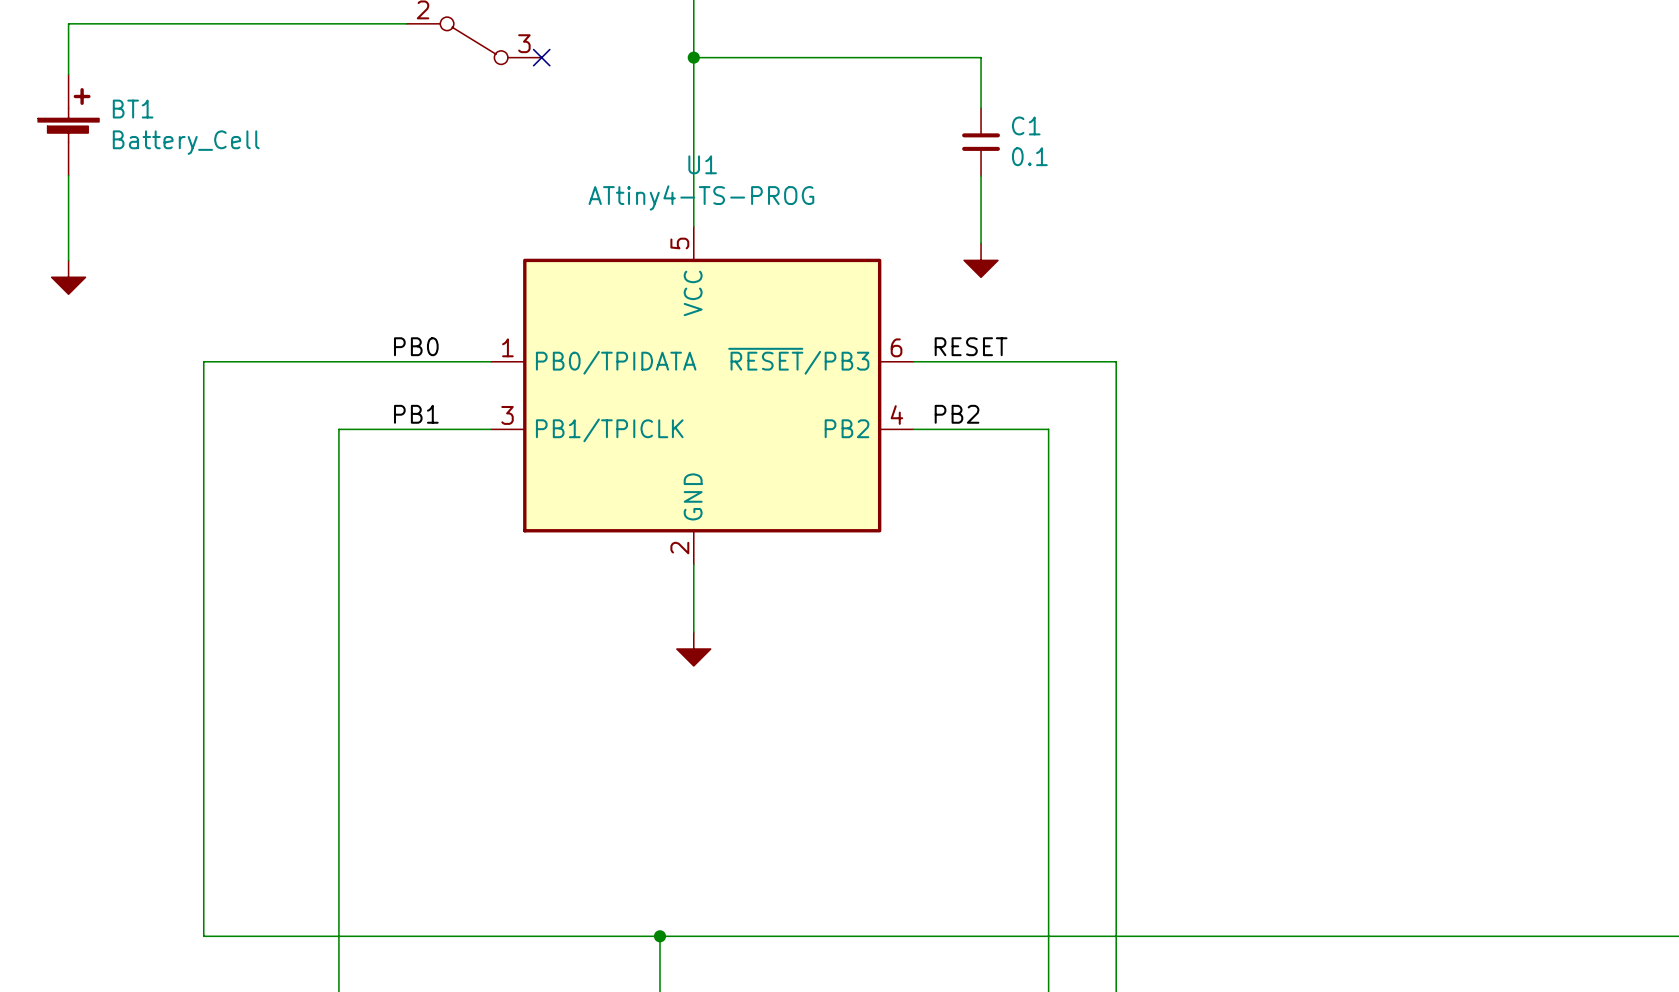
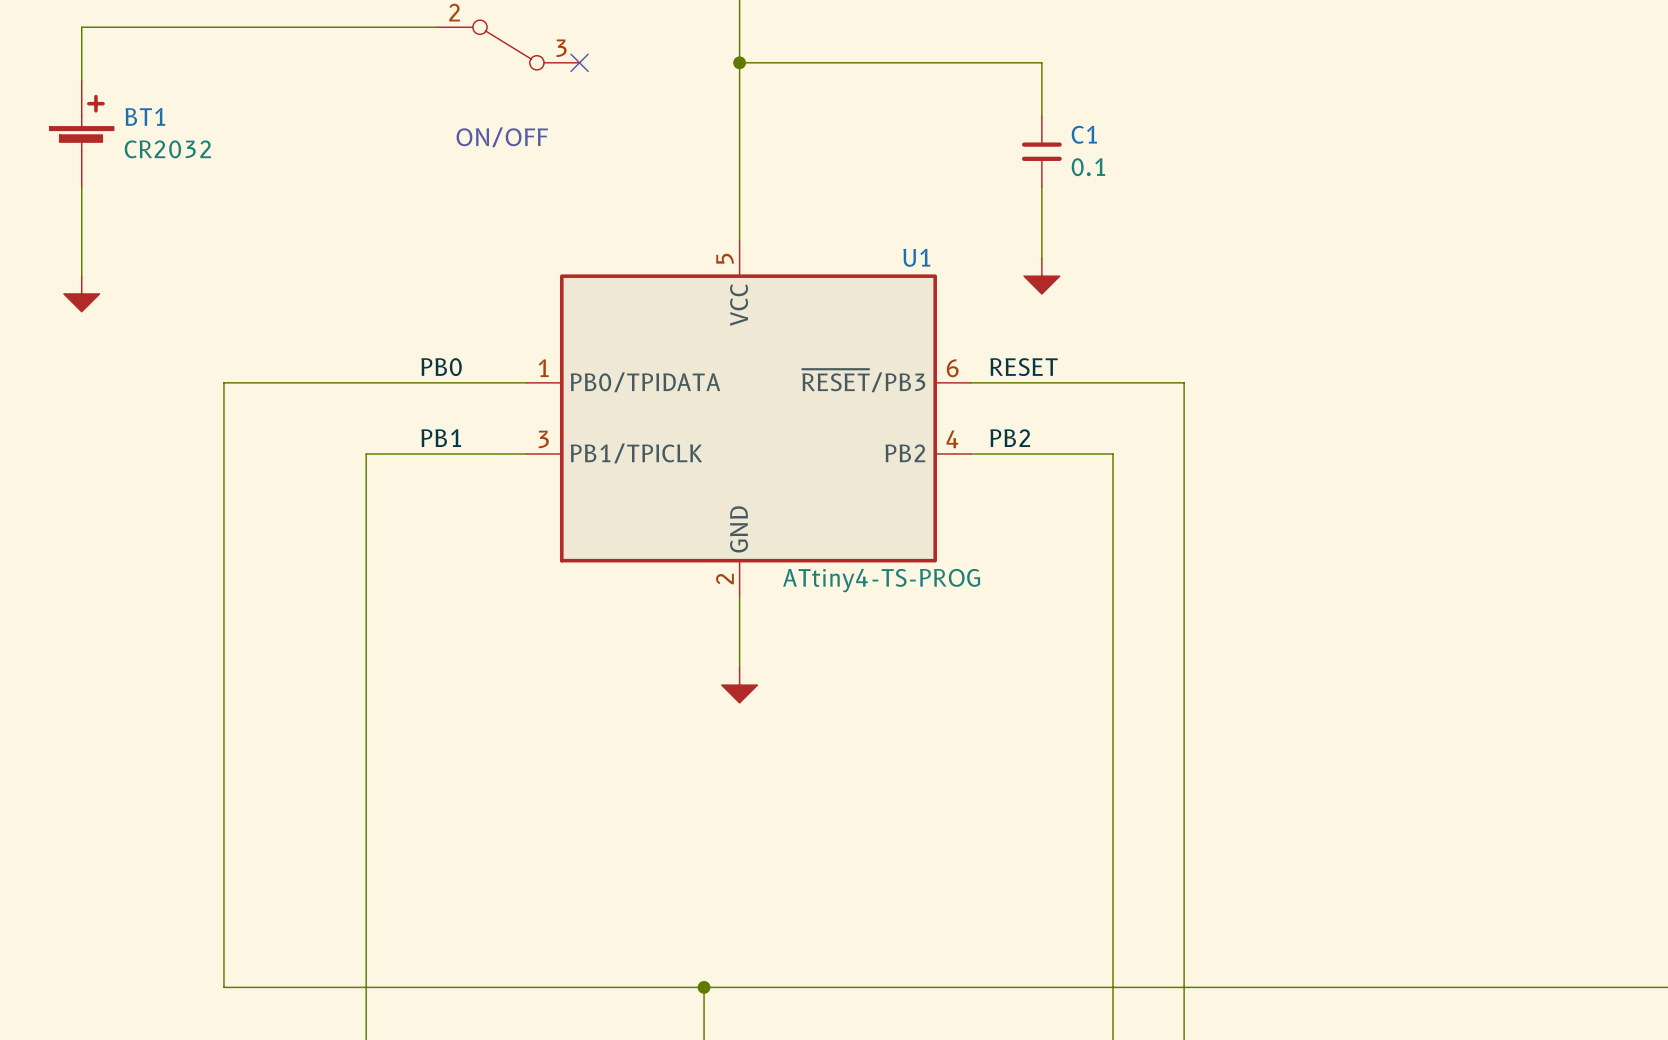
text: none -> ON/OFF (502, 137)
BT1 value: Battery_Cell (186, 142) -> CR2032 (167, 149)
U1 name position: U1 (702, 164) -> U1 (916, 257)
U1 value position: ATtiny4-TS-PROG (701, 197) -> ATtiny4-TS-PROG (881, 580)

